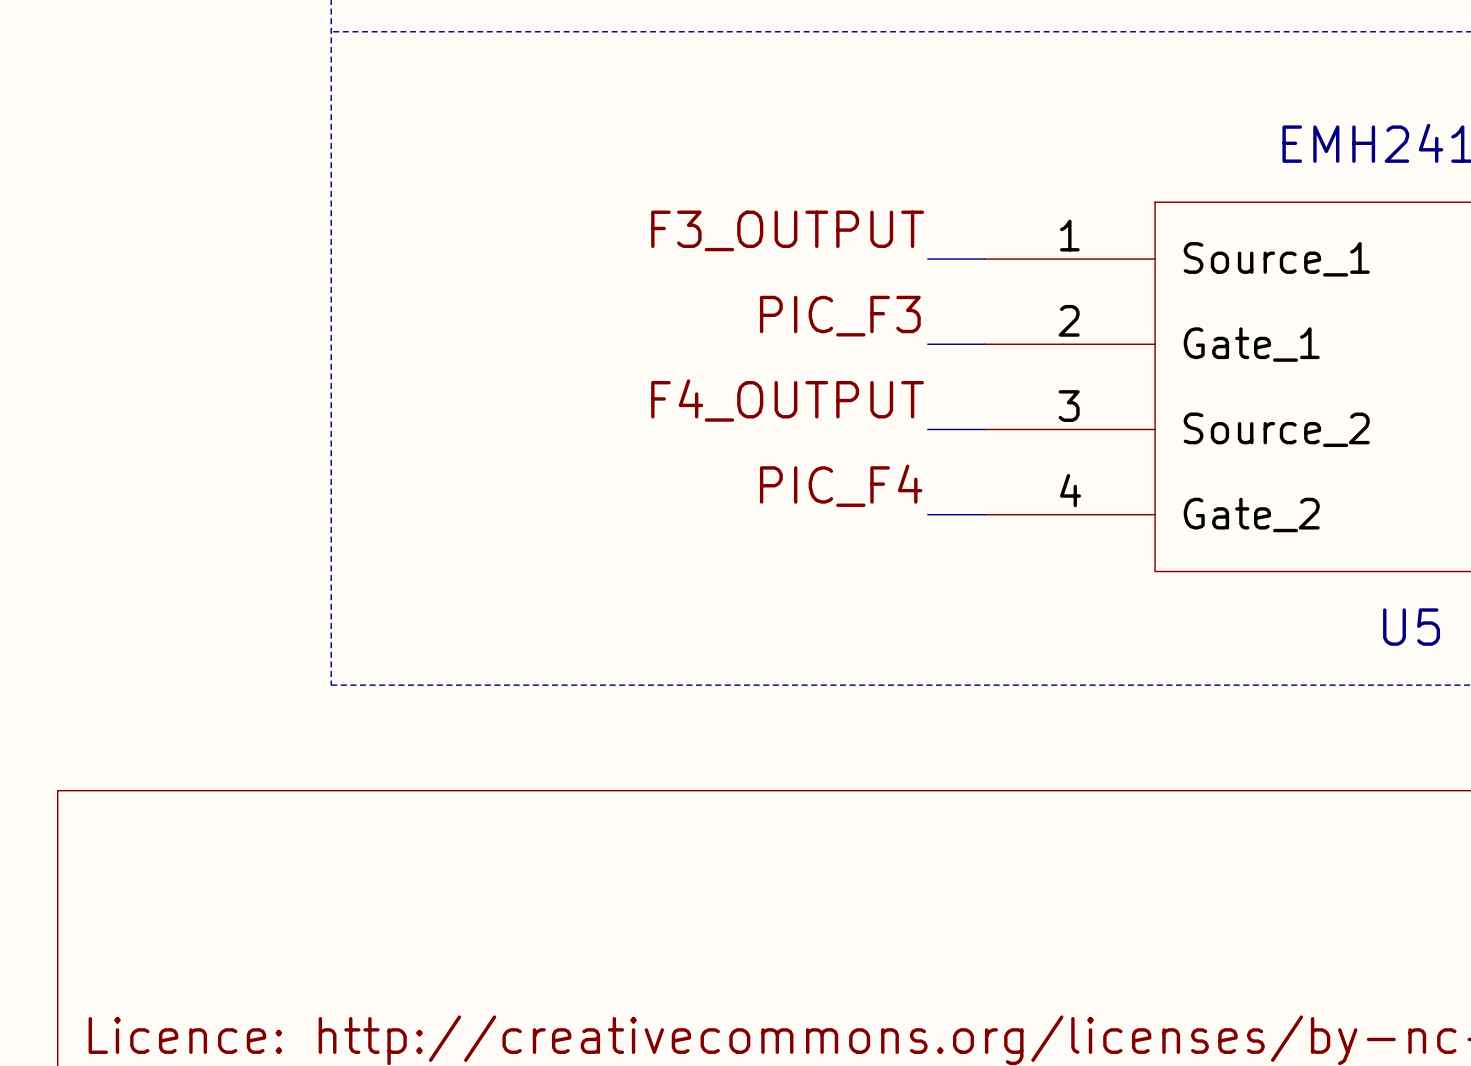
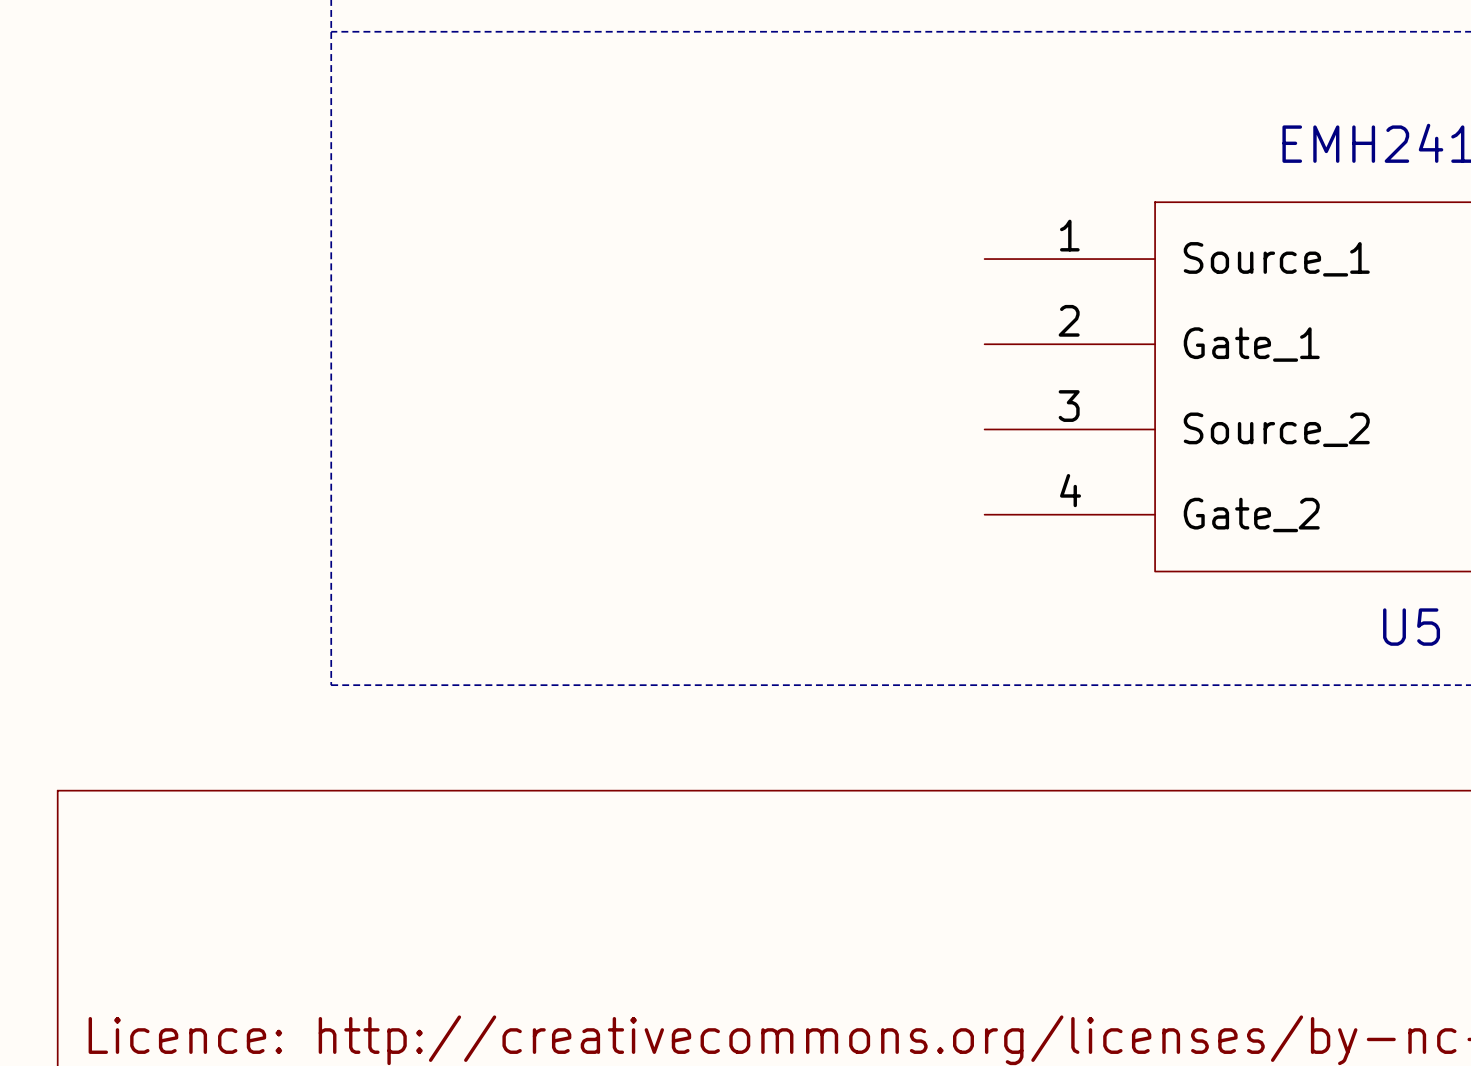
label: F3_OUTPUT (787, 230) -> none
wire: (927, 259) (984, 259) -> none
label: PIC_F3 (840, 316) -> none
wire: (927, 344) (984, 344) -> none
label: F4_OUTPUT (787, 400) -> none
wire: (927, 429) (984, 429) -> none
label: PIC_F4 (841, 485) -> none
wire: (927, 514) (984, 514) -> none

